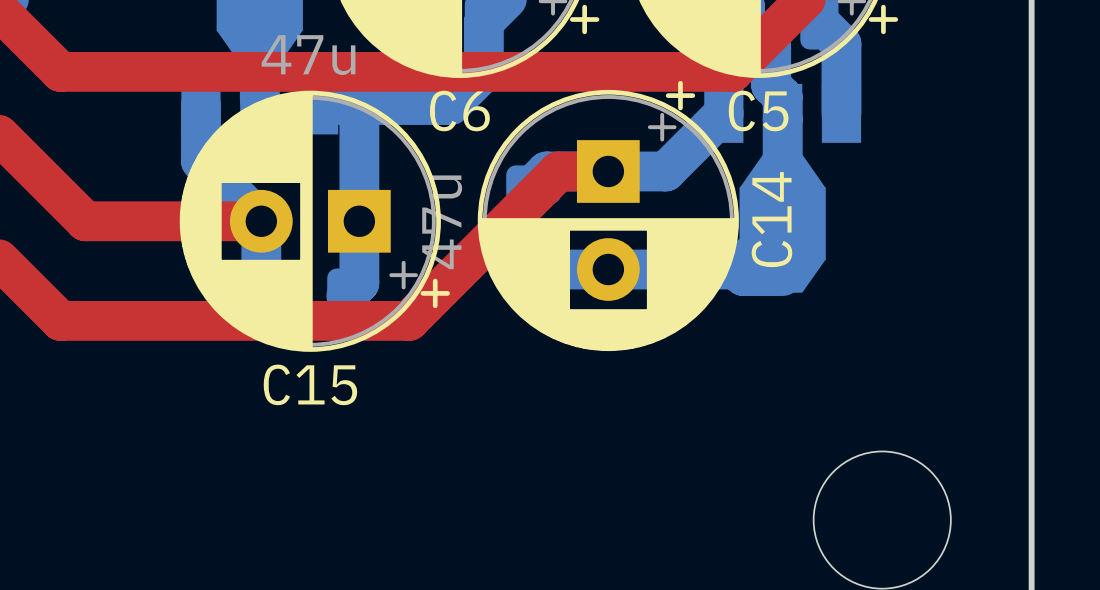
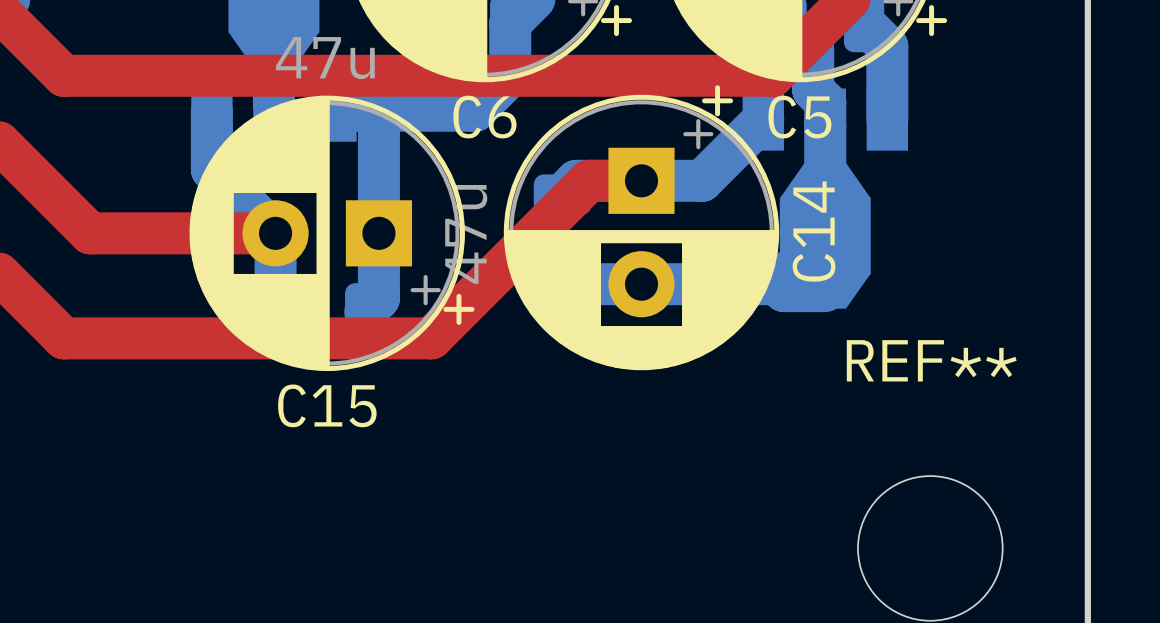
REF** name: none -> REF** (931, 360)

